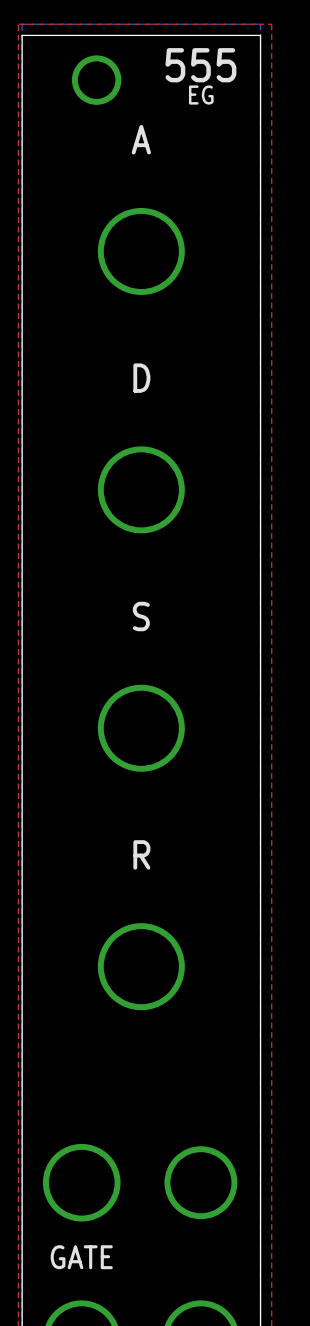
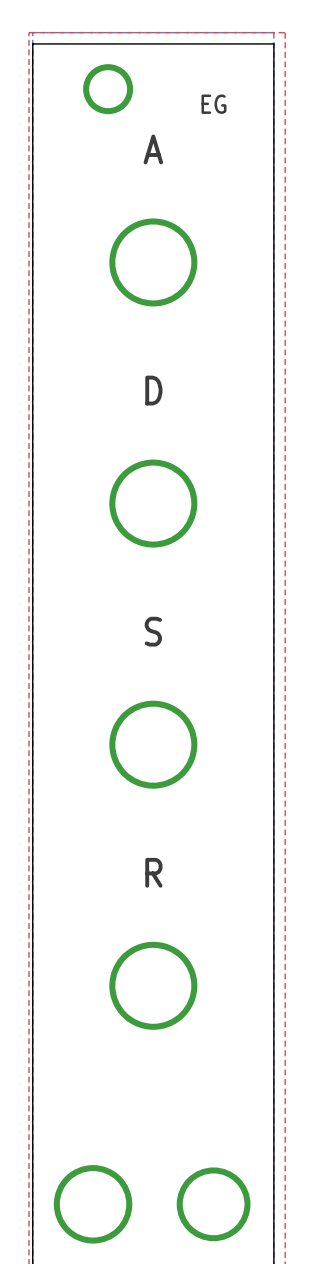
text: 555 (200, 65) -> none

